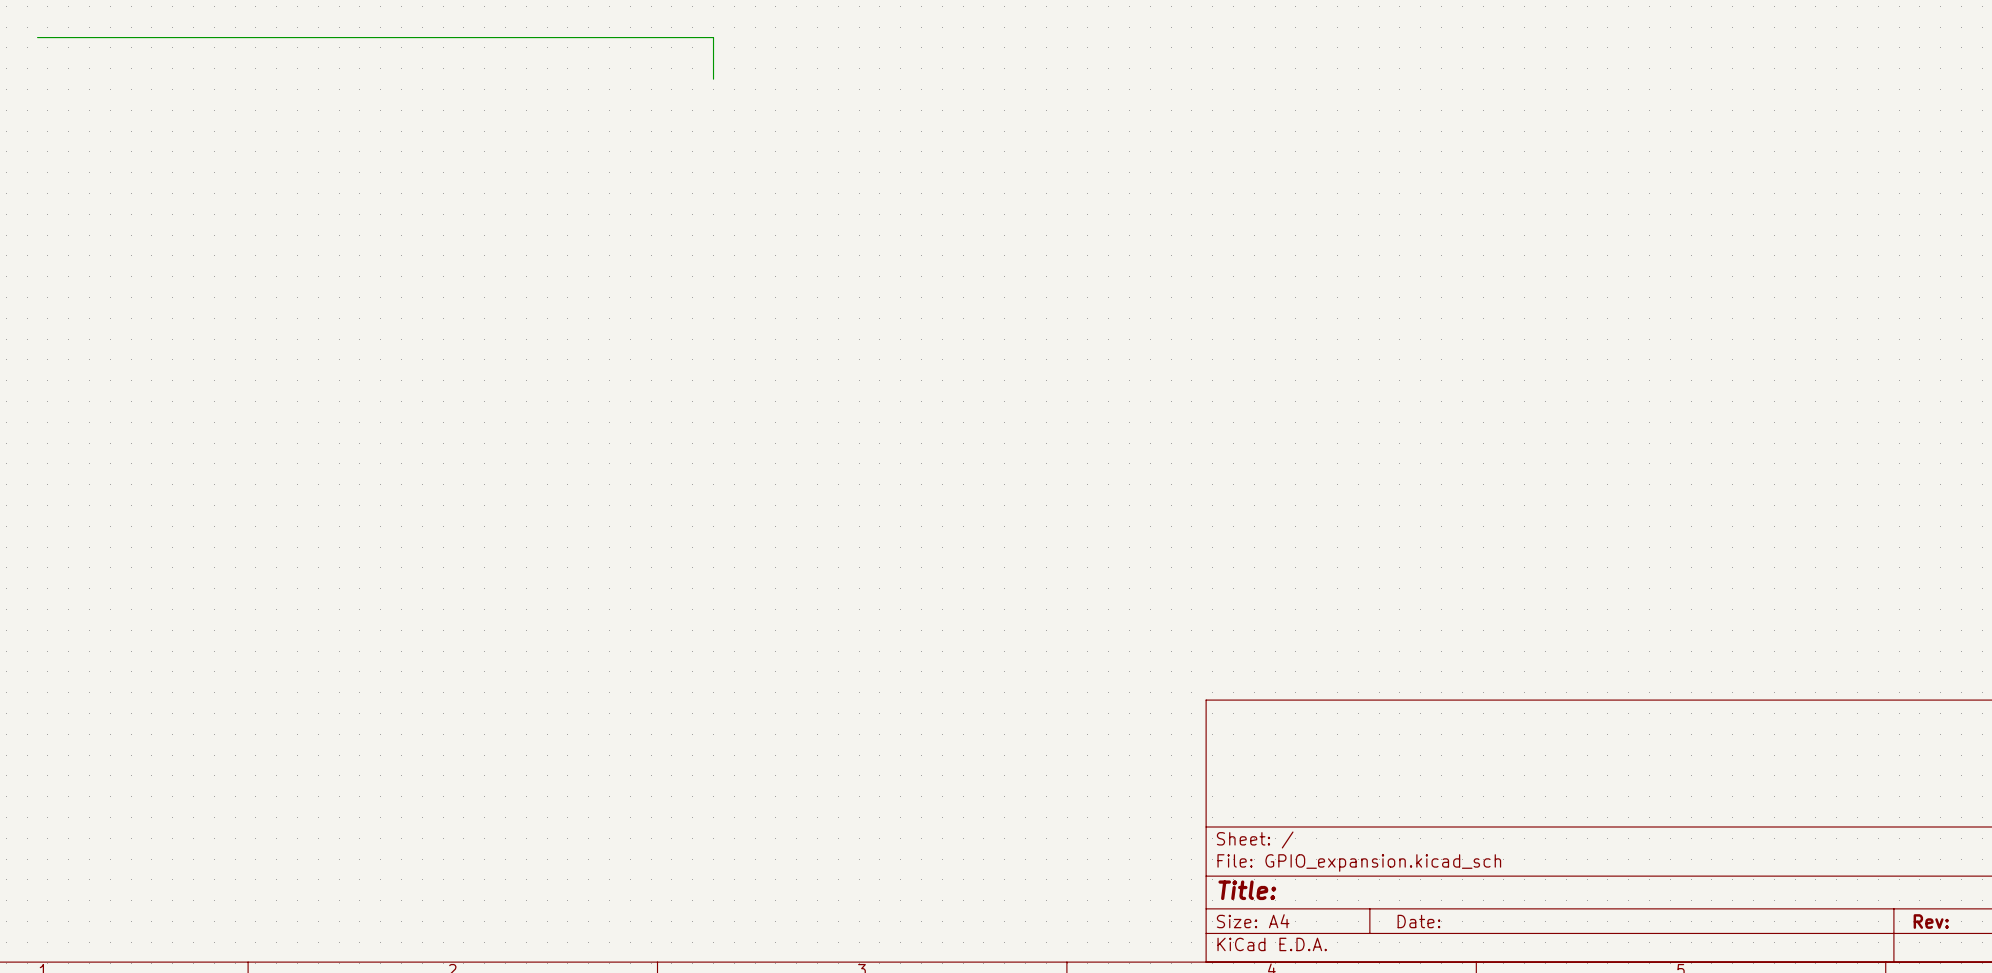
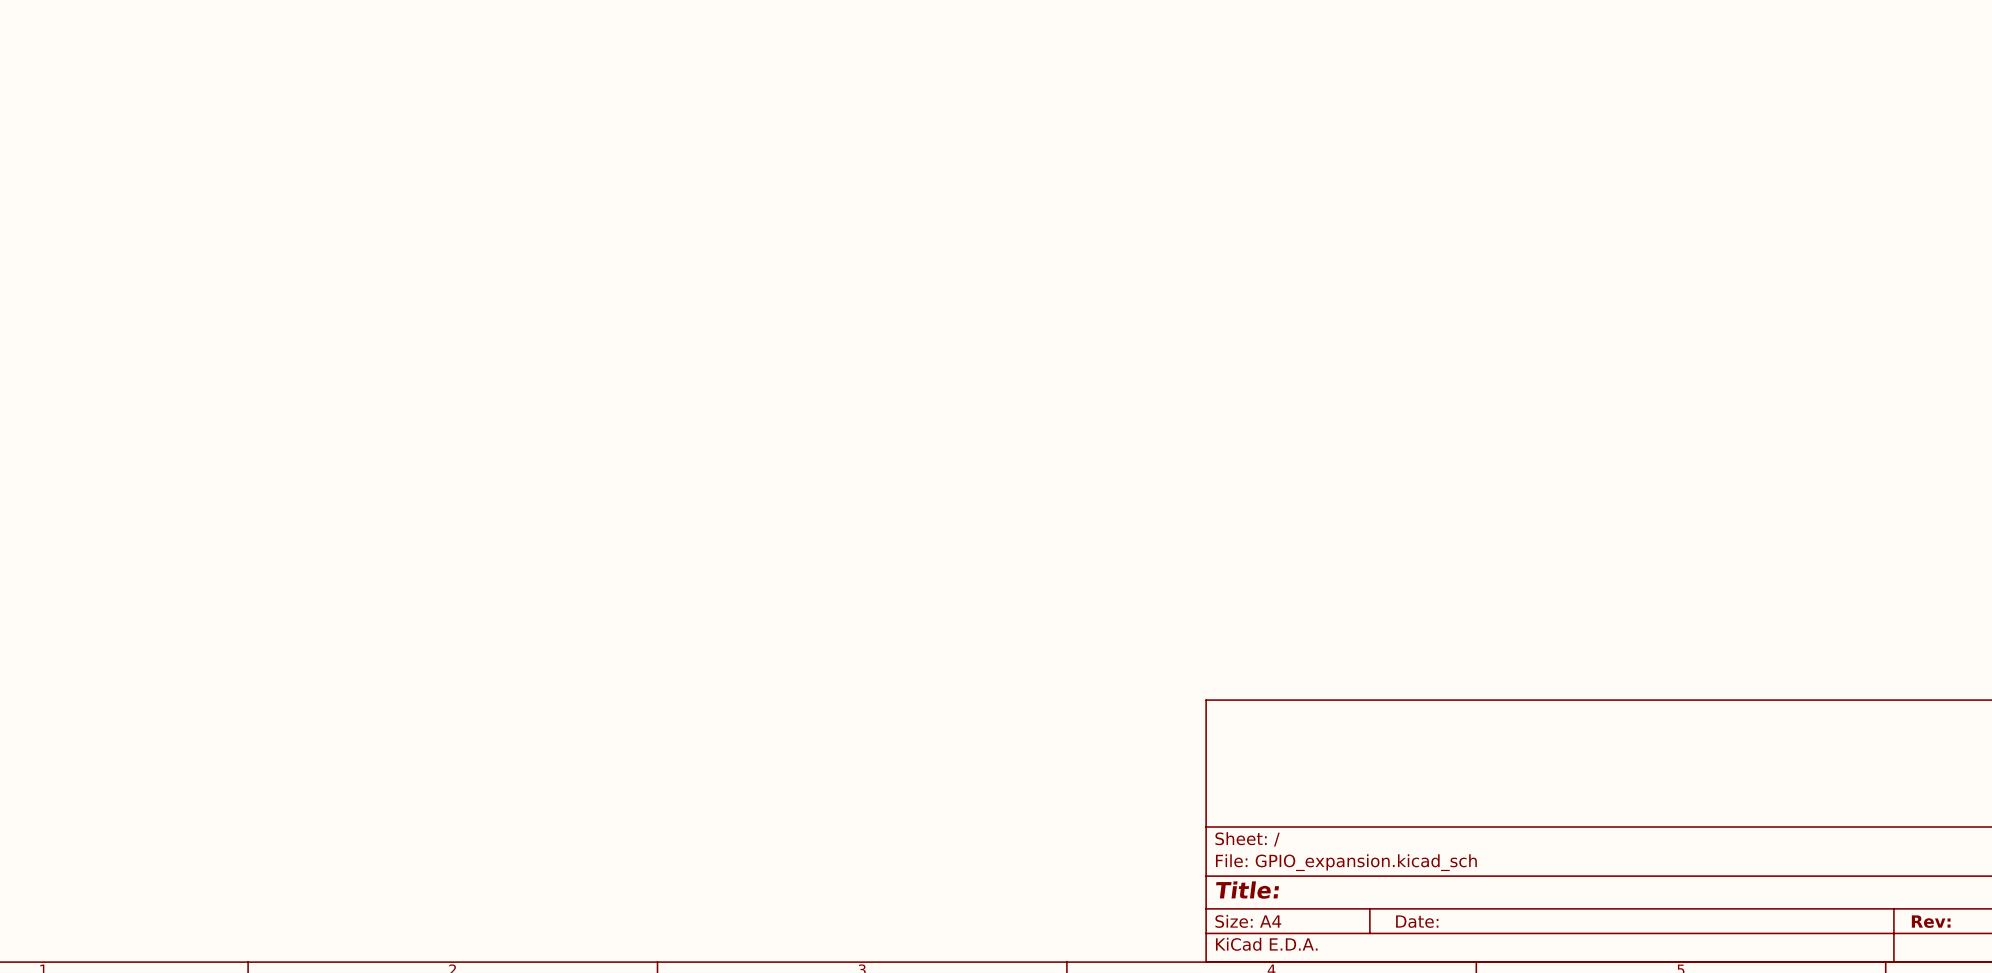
wire: (37, 37) (713, 37) (713, 79) -> none

